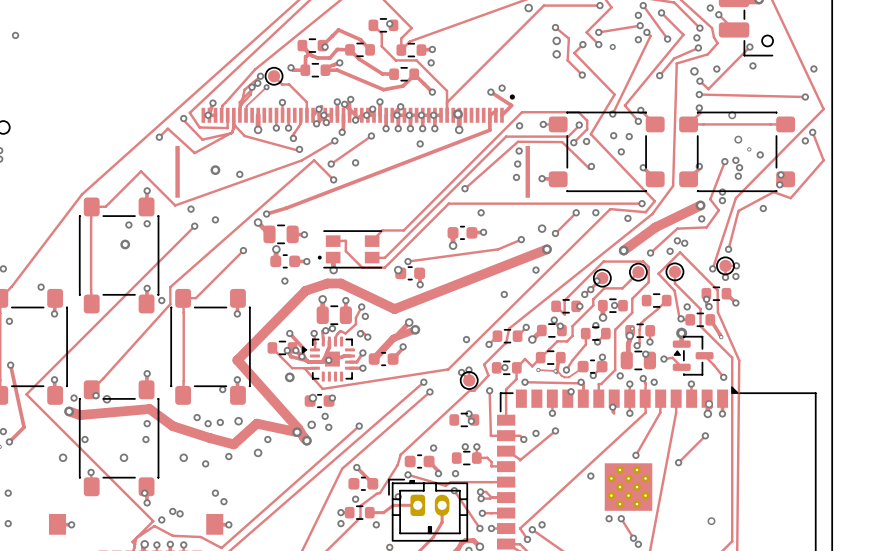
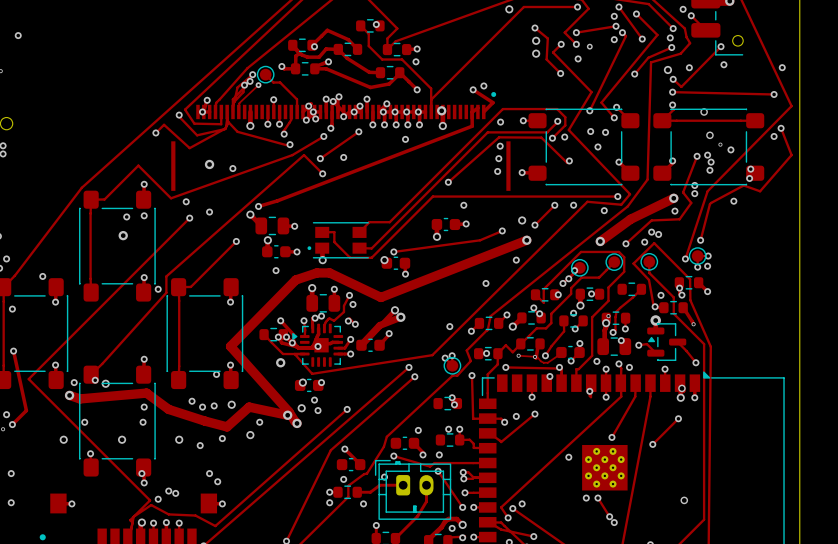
via: none -> (578, 58)

